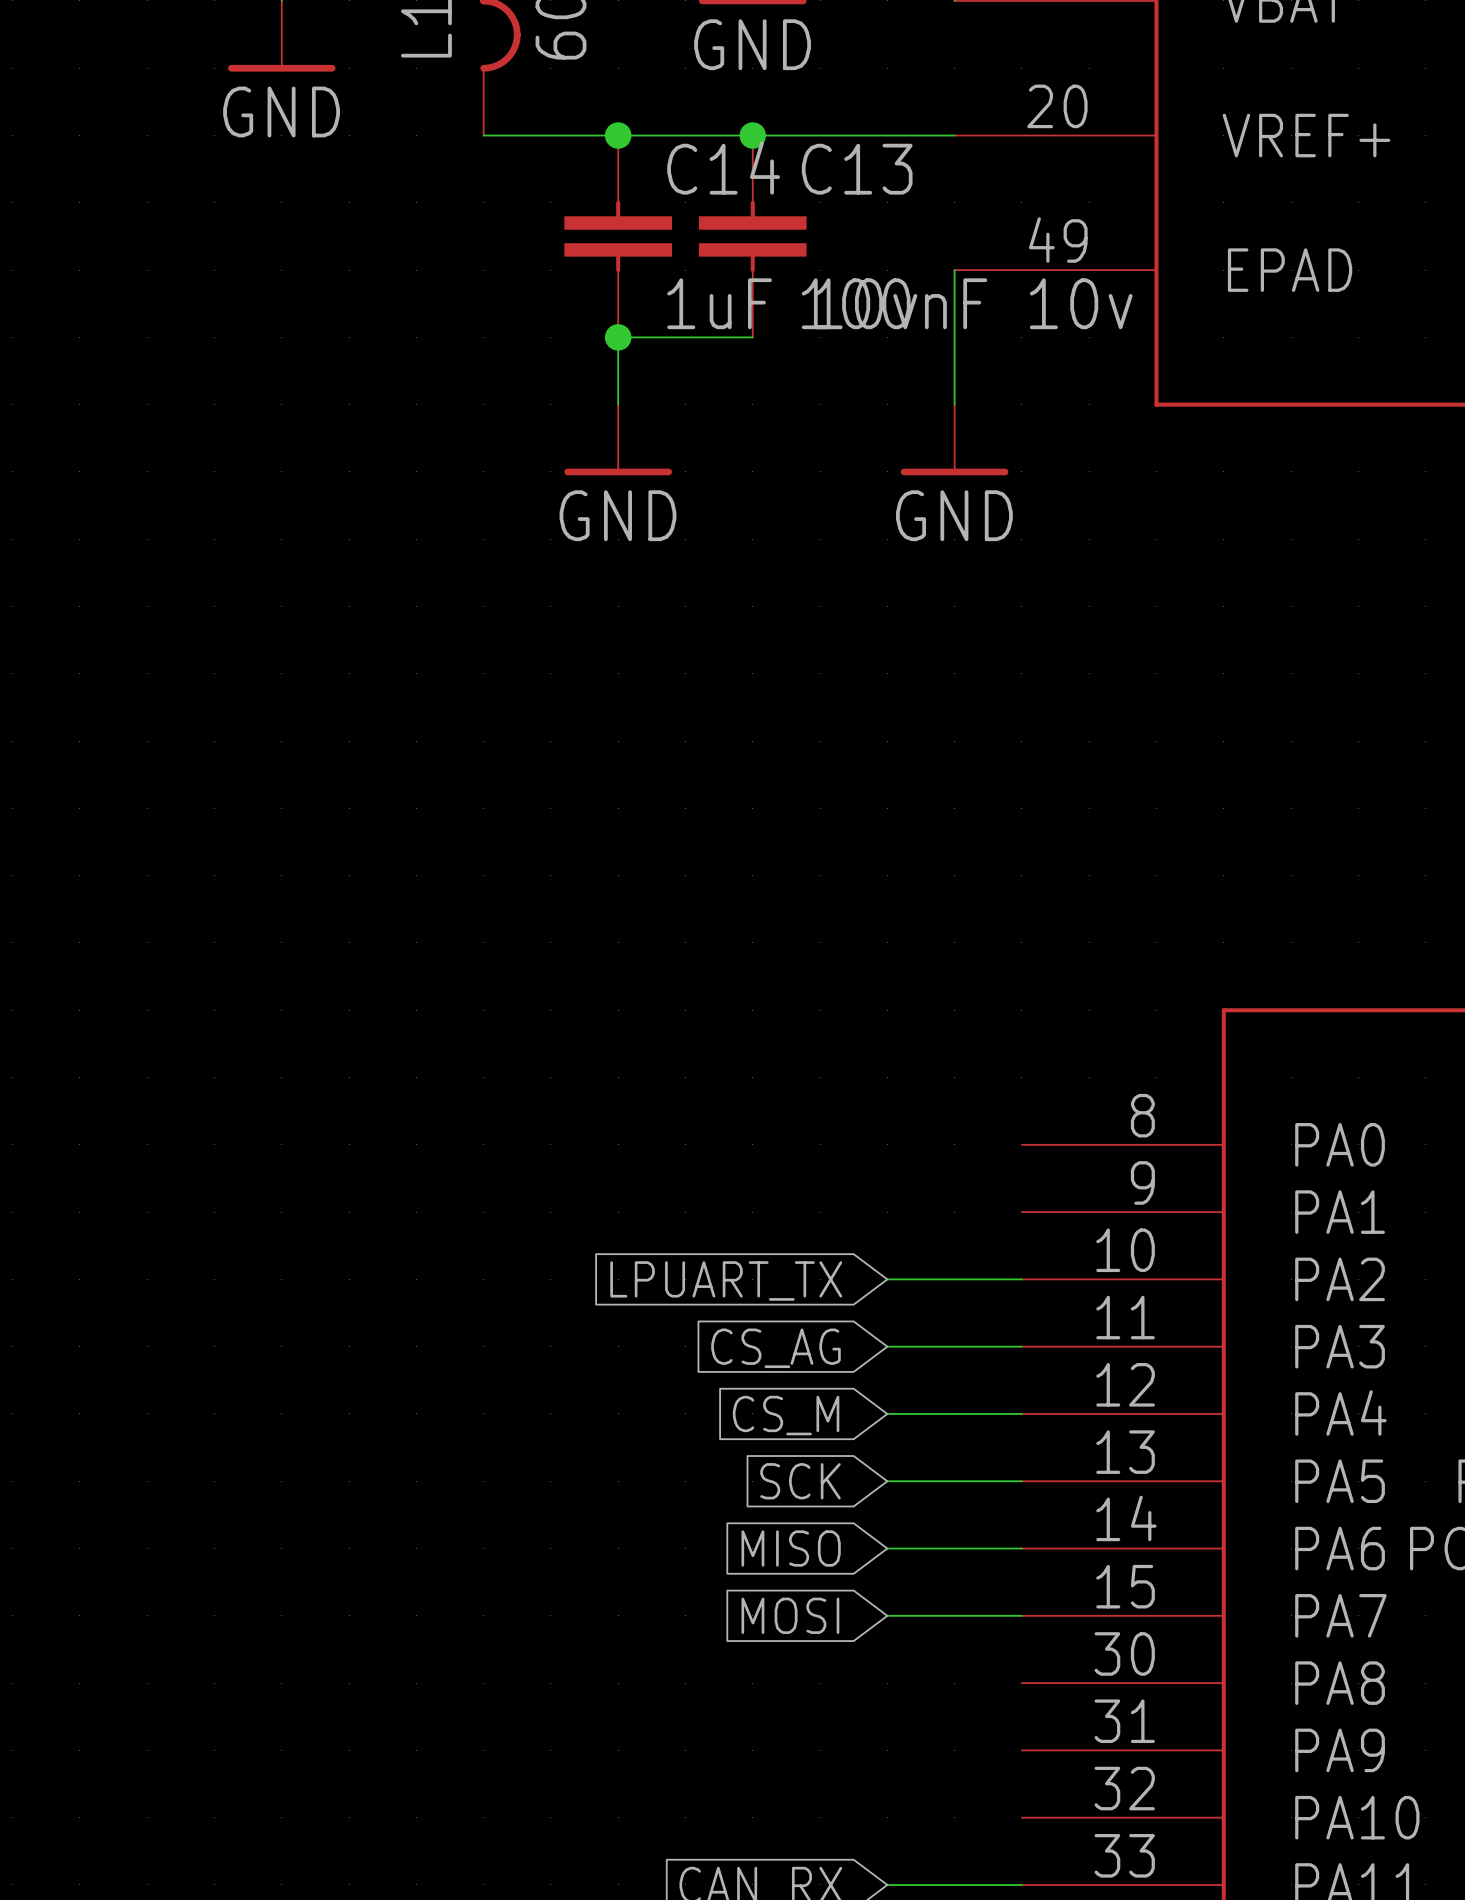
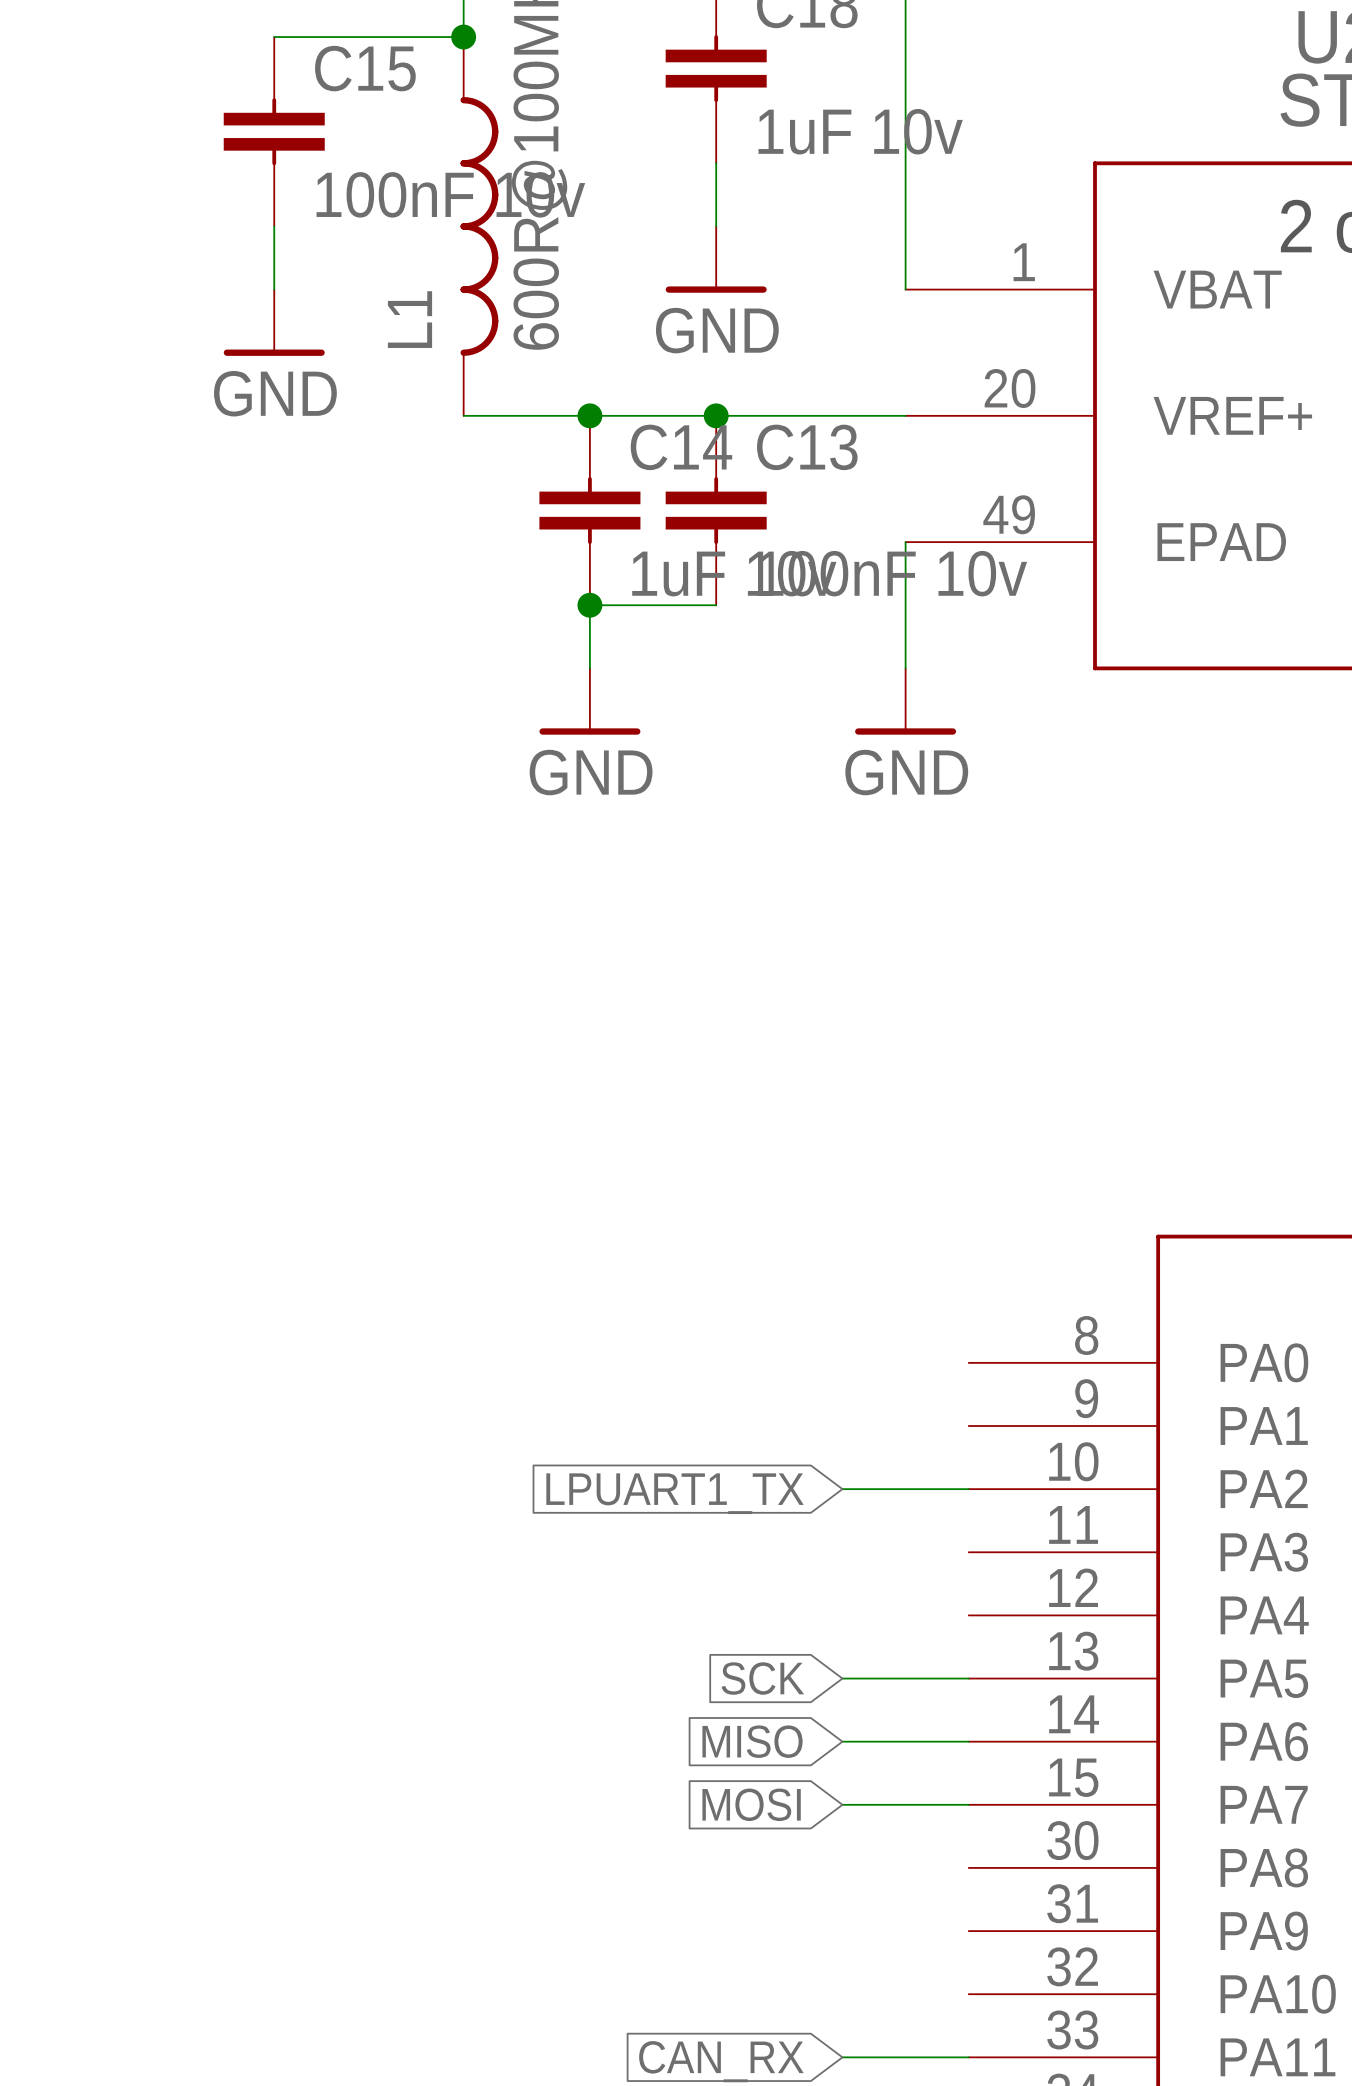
global label: LPUART_TX (726, 1280) -> LPUART1_TX (675, 1493)
wire: (887, 1346) (1021, 1346) -> none
global label: CS_AG (775, 1348) -> none
wire: (887, 1413) (1021, 1413) -> none
global label: CS_M (786, 1415) -> none

